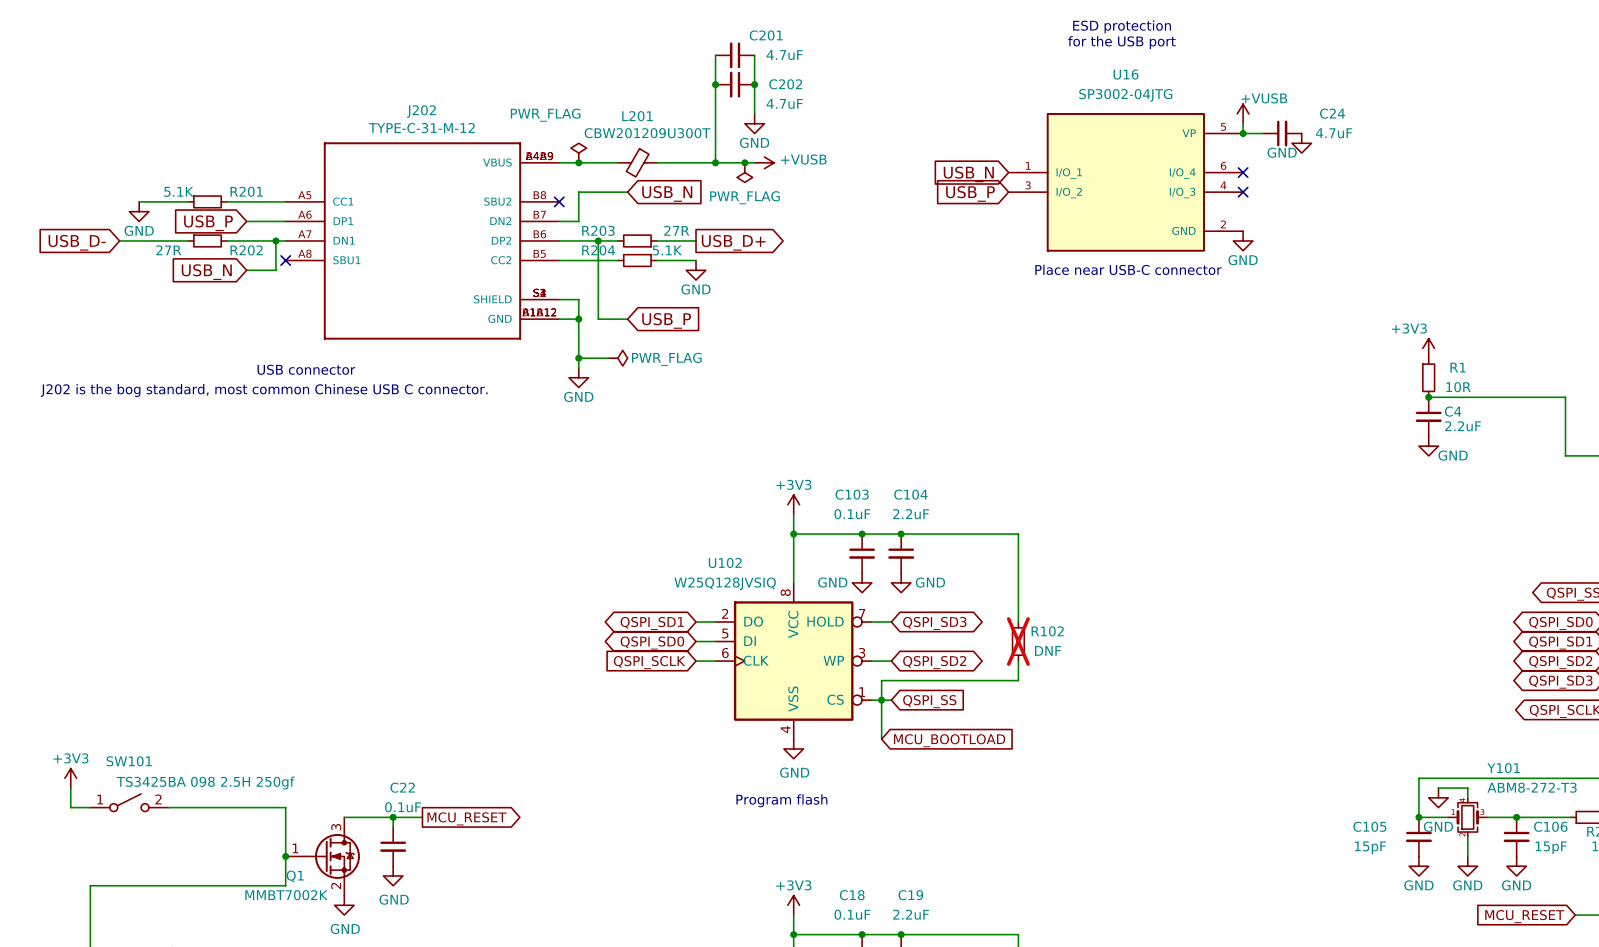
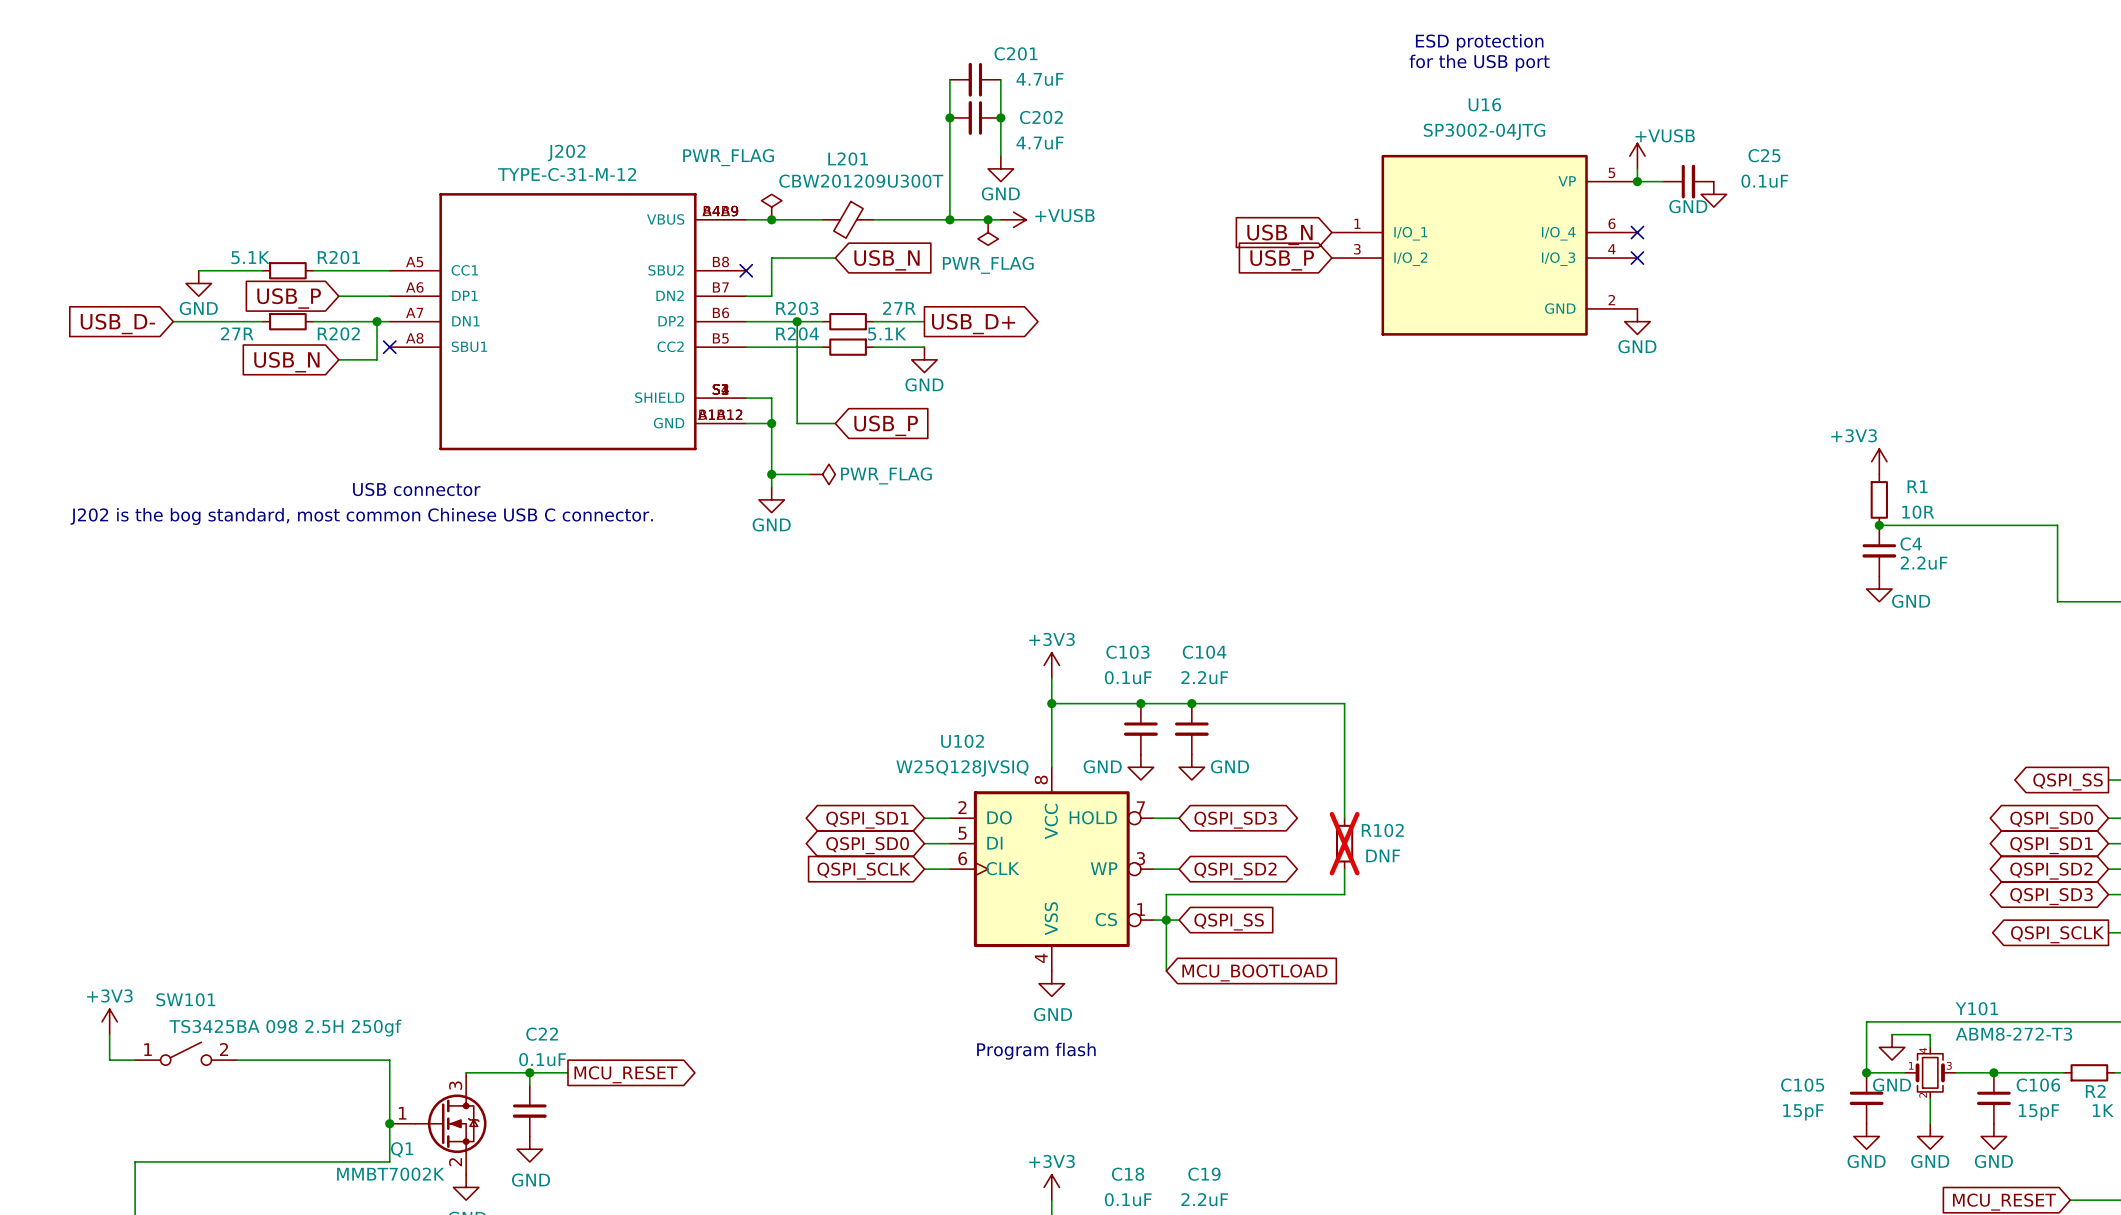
C24 name: C24 (1332, 113) -> C25 (1764, 155)
C24 value: 4.7uF (1334, 133) -> 0.1uF (1764, 181)
text: Place near USB-C connector (1128, 269) -> none

